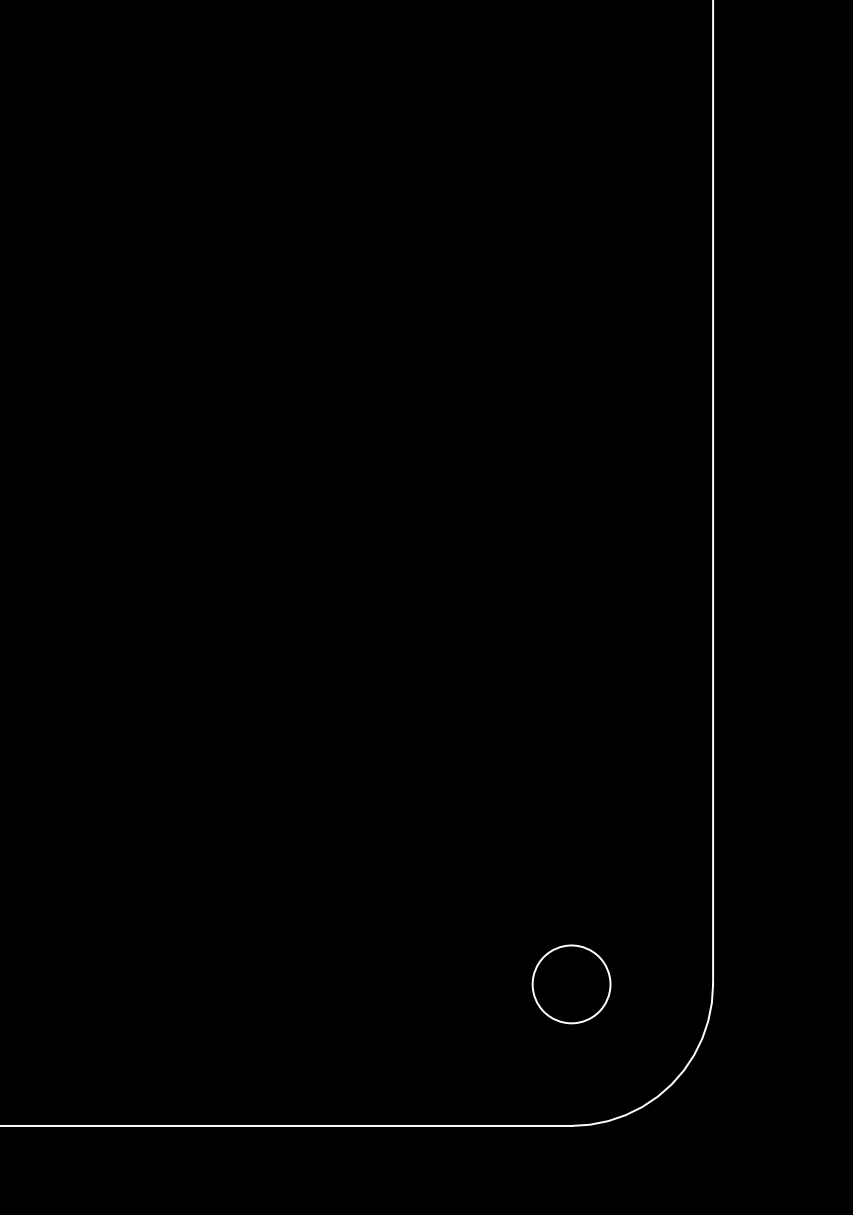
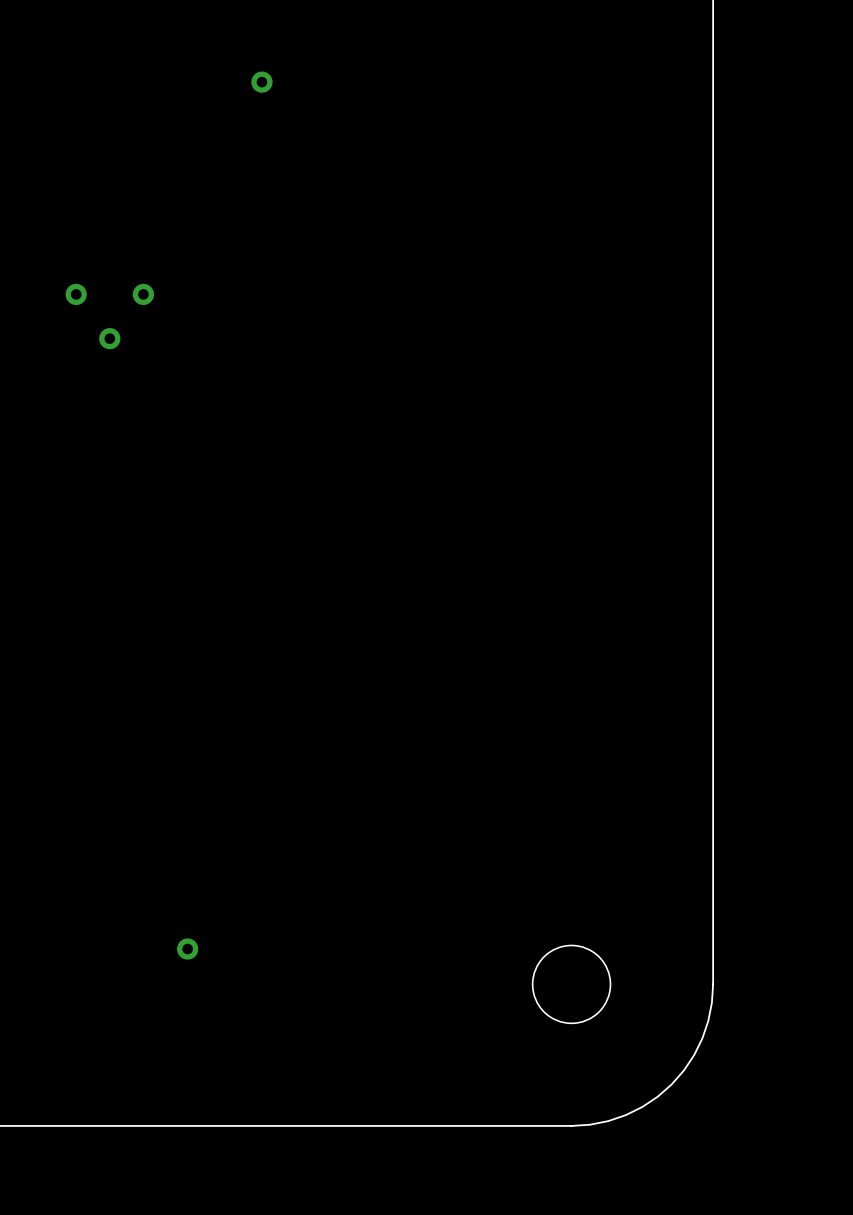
via: none -> (261, 82)
via: none -> (76, 294)
via: none -> (143, 294)
via: none -> (109, 338)
via: none -> (187, 949)

